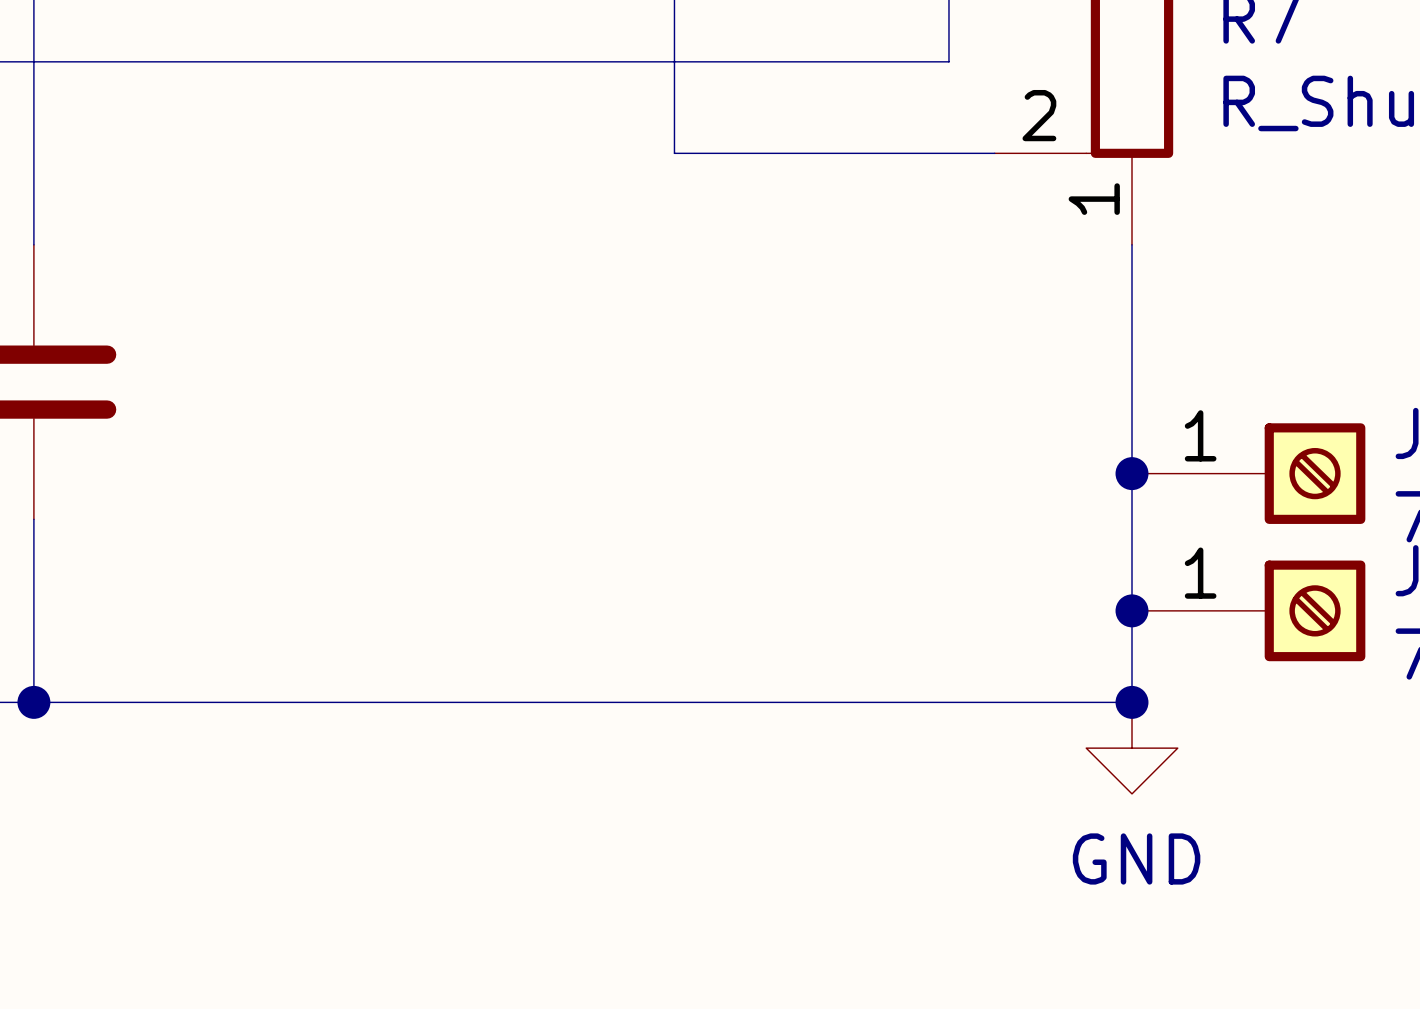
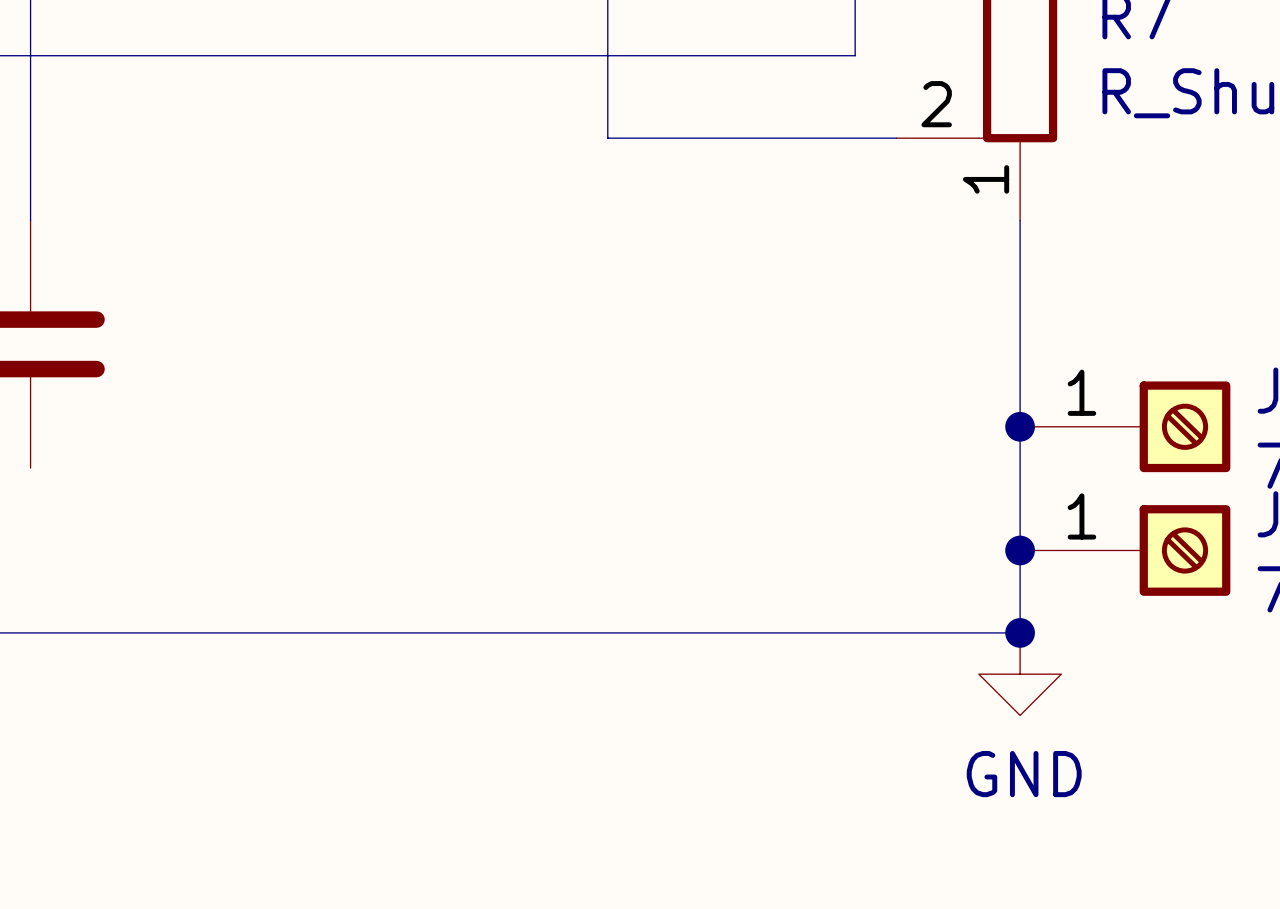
wire: (33, 519) (33, 702) -> none
junction: (33, 702) -> none

